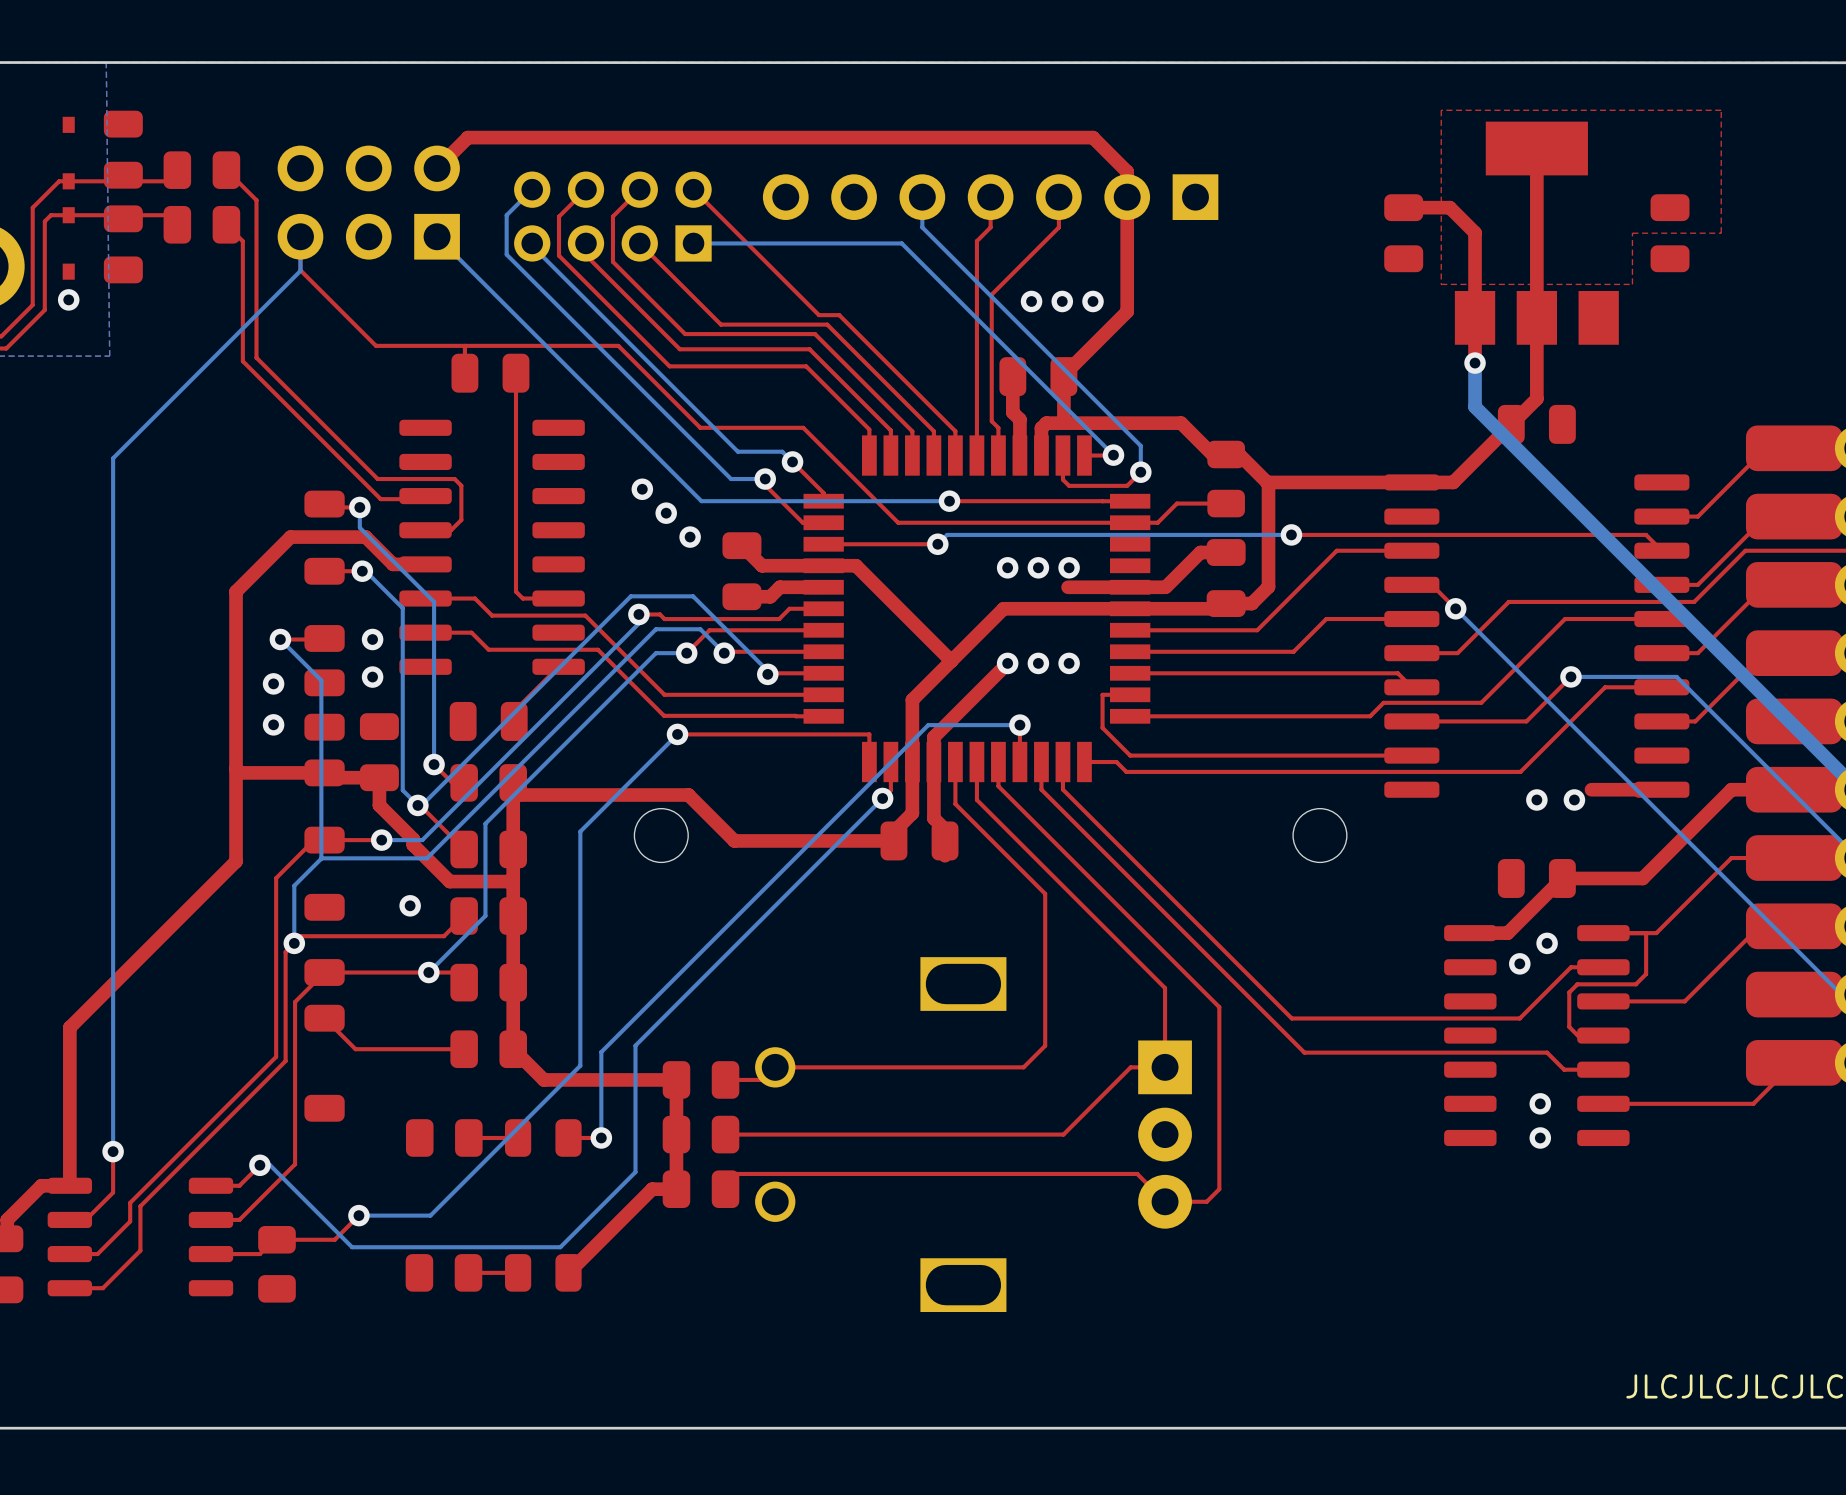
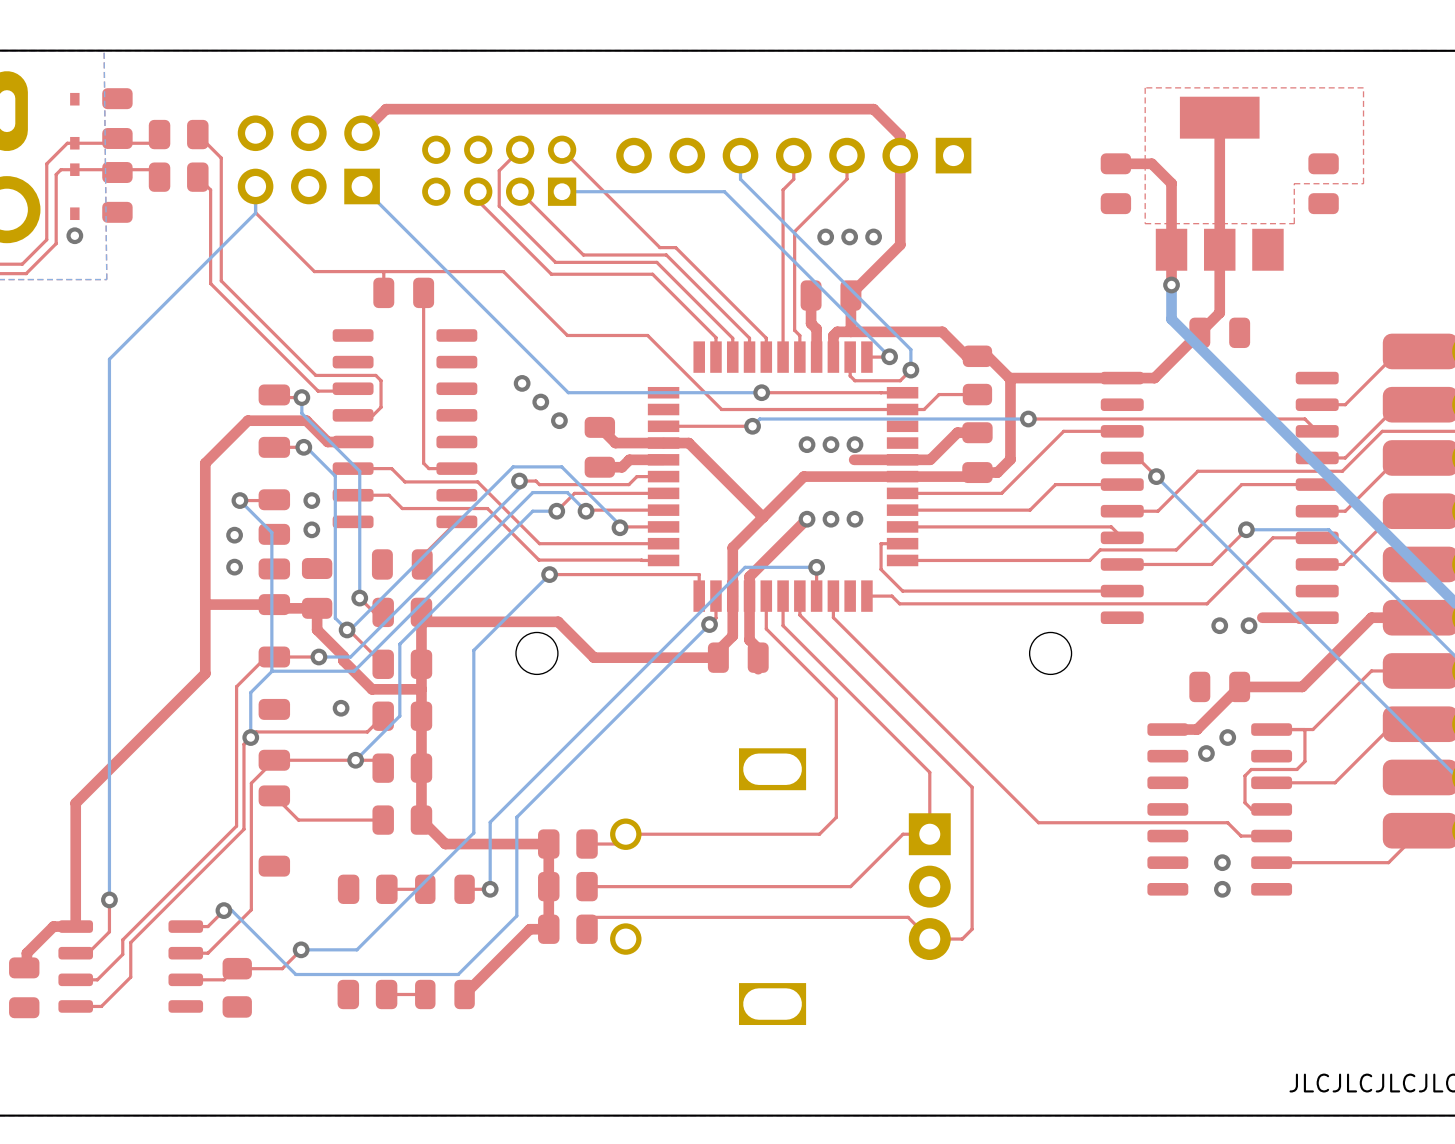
bottom track: (532, 189) (506, 215) (506, 254) (731, 479) (765, 479) -> none
top track: (586, 189) (559, 216) (559, 255) (669, 366) (806, 366) (869, 429) (869, 455) -> none
bottom track: (532, 243) (532, 246) (737, 451) (782, 451) (792, 461) -> none
top track: (792, 461) (823, 493) (823, 501) -> none
via: (792, 461) -> none
top track: (765, 479) (765, 485) (802, 522) (823, 522) -> none
via: (765, 479) -> none
top track: (1062, 762) (1062, 789) (1291, 1018) (1519, 1018) (1571, 967) (1603, 967) -> none

